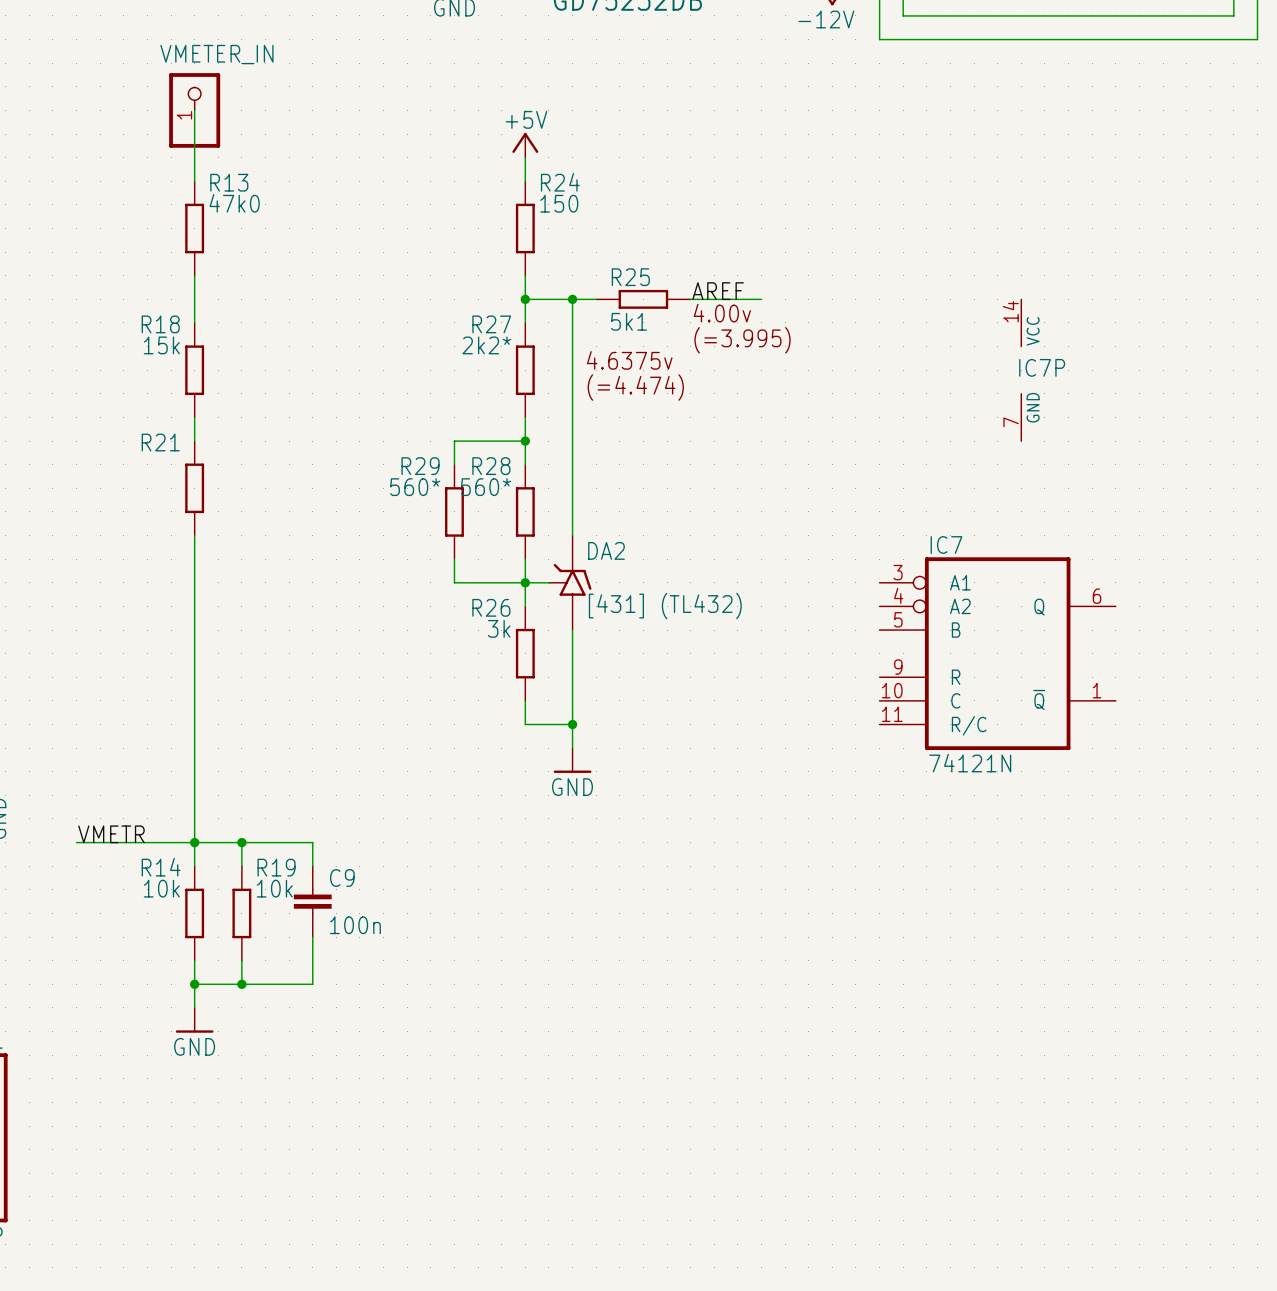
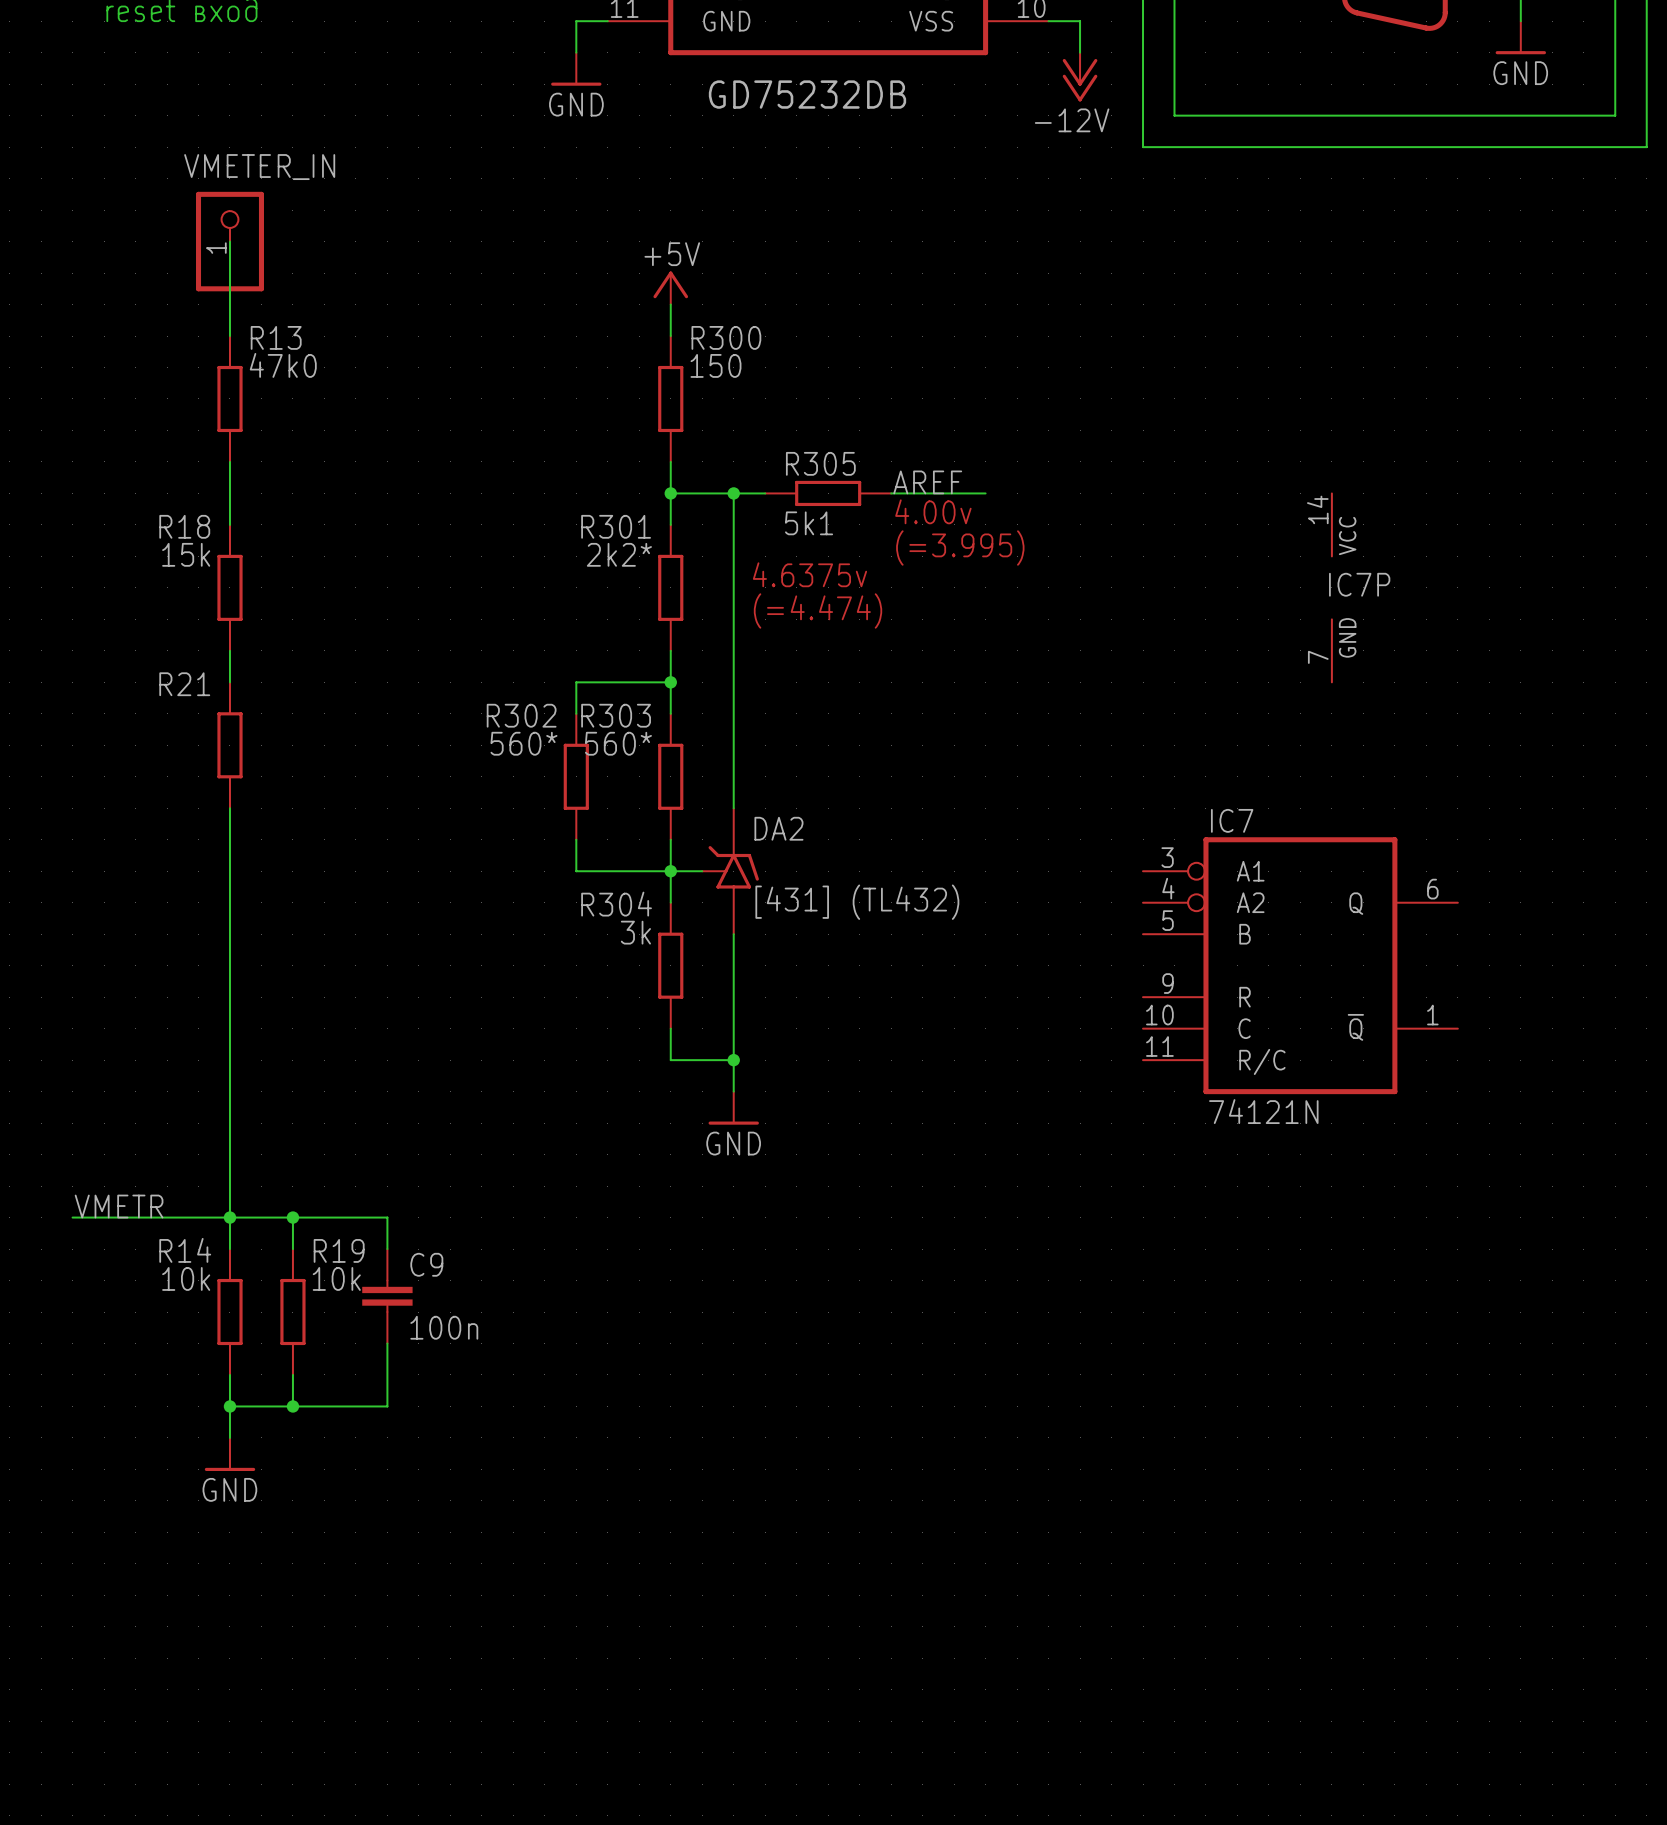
R24 name: R24 (560, 182) -> R300 (726, 337)
R25 name: R25 (630, 277) -> R305 (820, 463)
R27 name: R27 (491, 324) -> R301 (616, 526)
R29 name: R29 (420, 466) -> R302 (521, 715)
R28 name: R28 (491, 466) -> R303 (616, 715)
R26 name: R26 (491, 607) -> R304 (616, 904)

